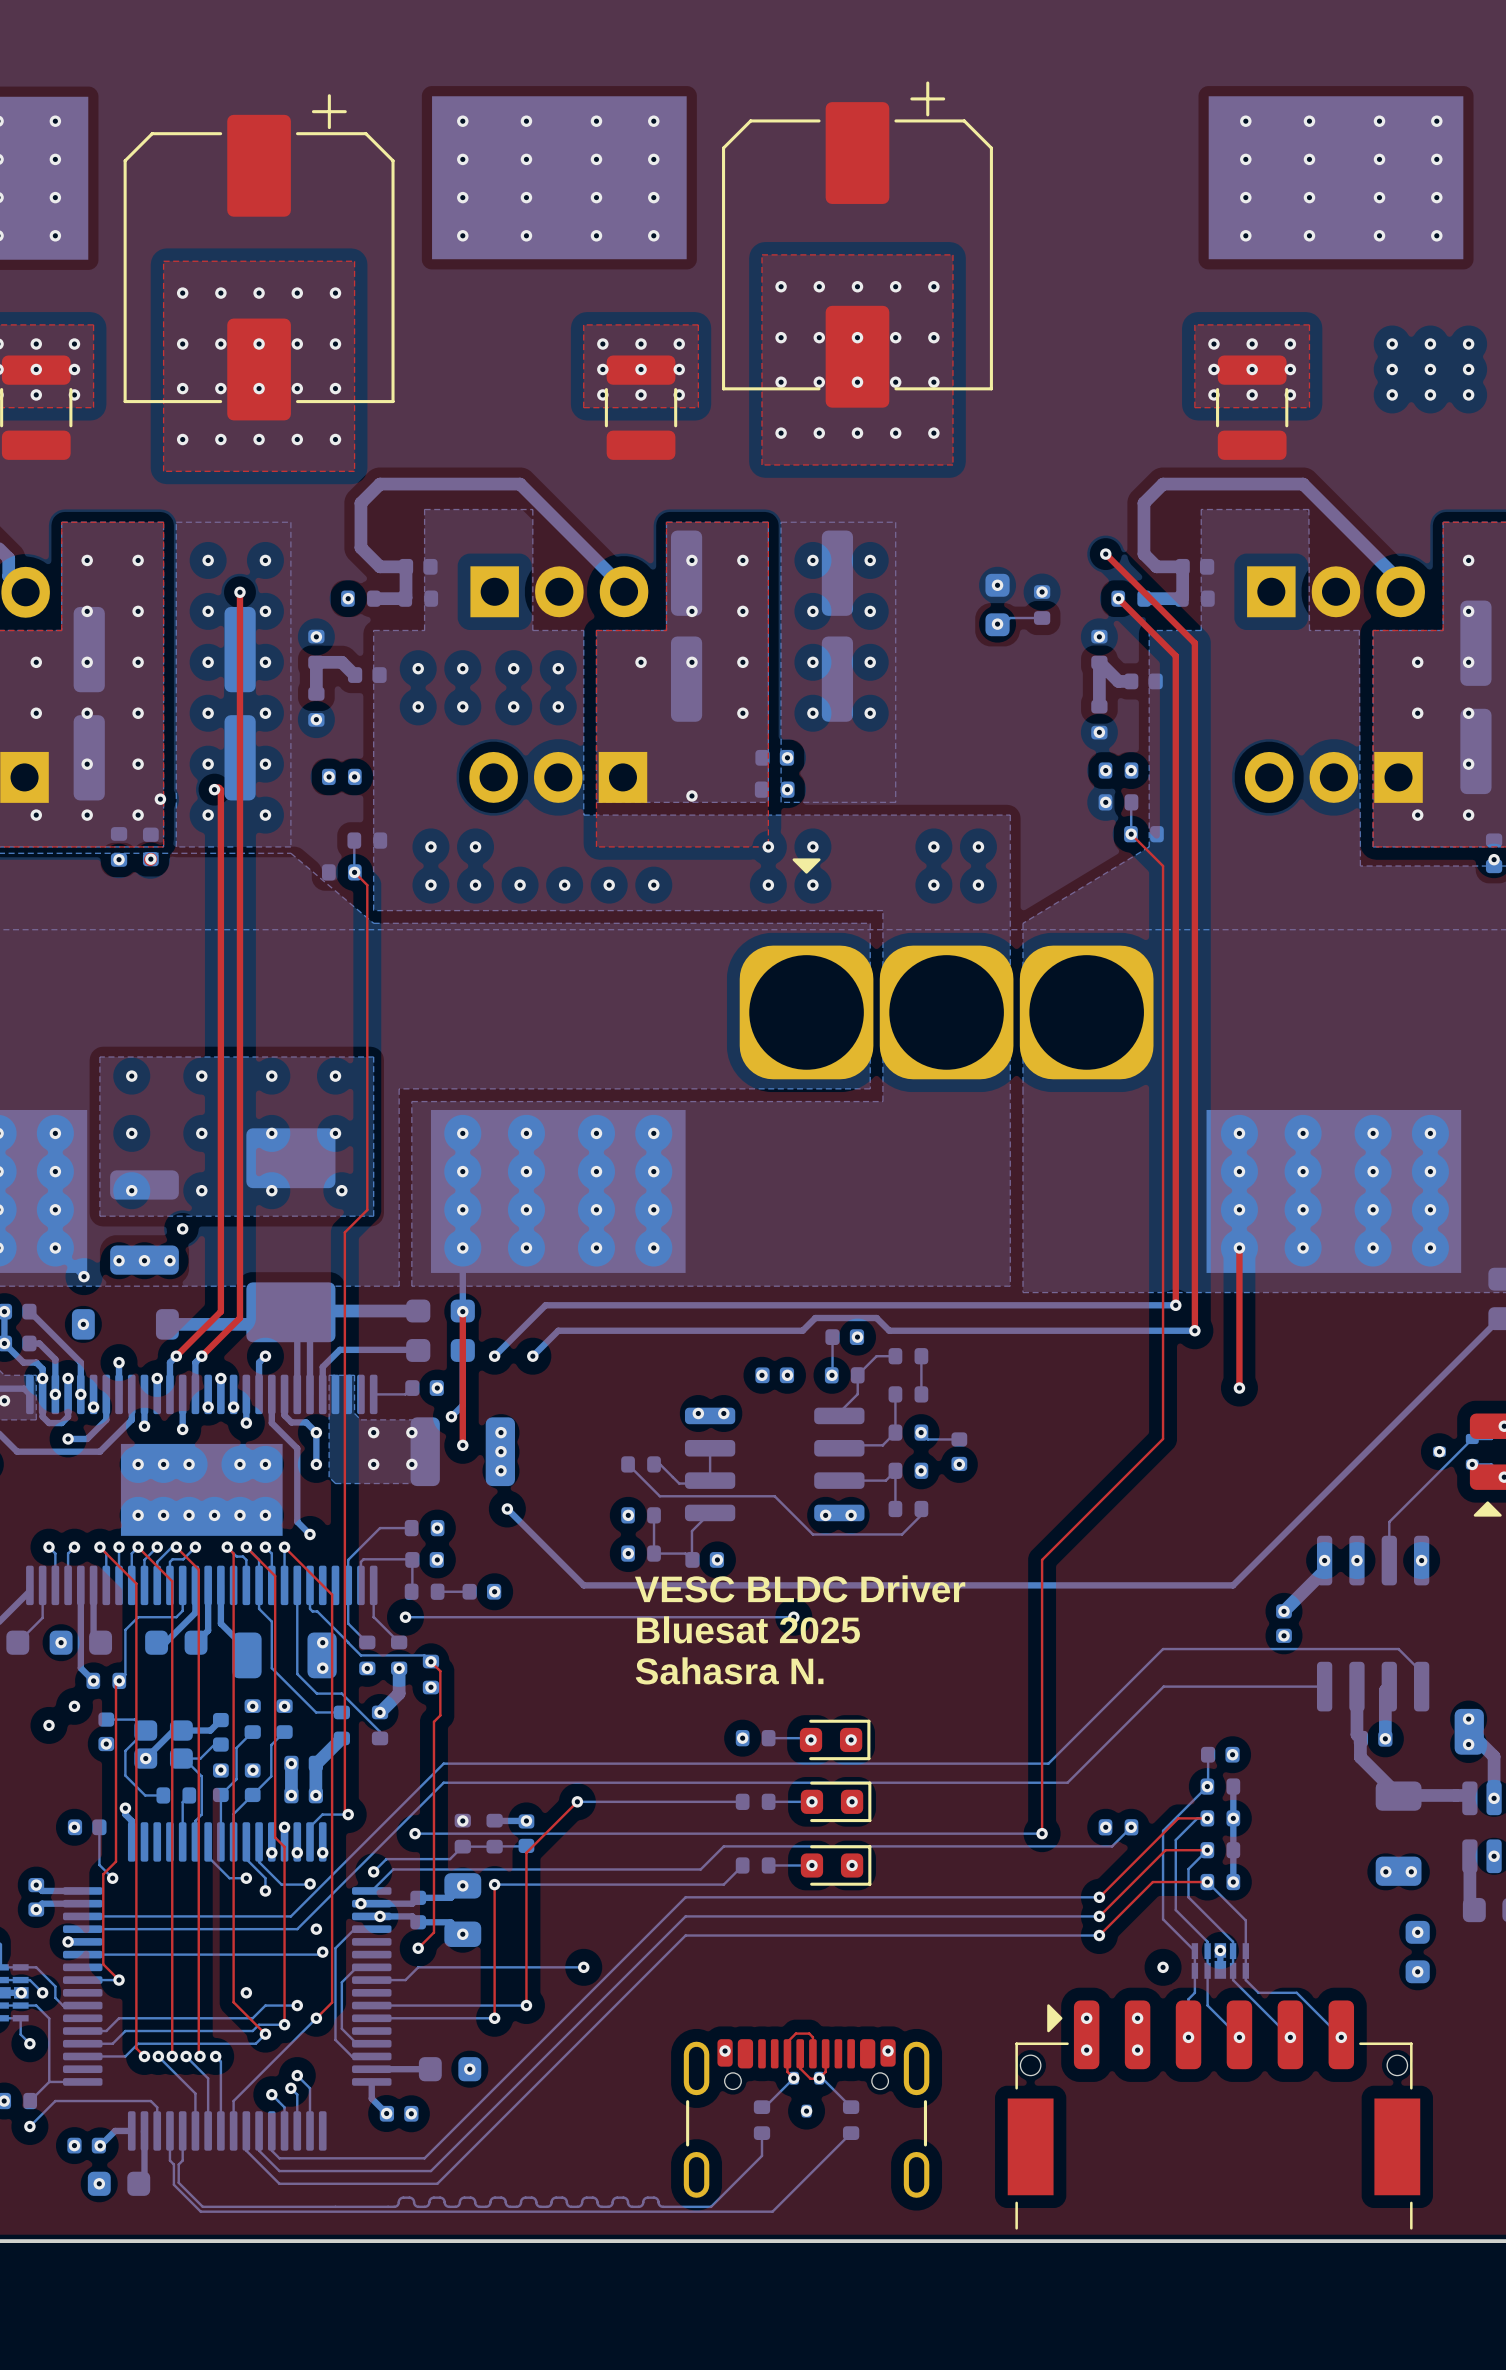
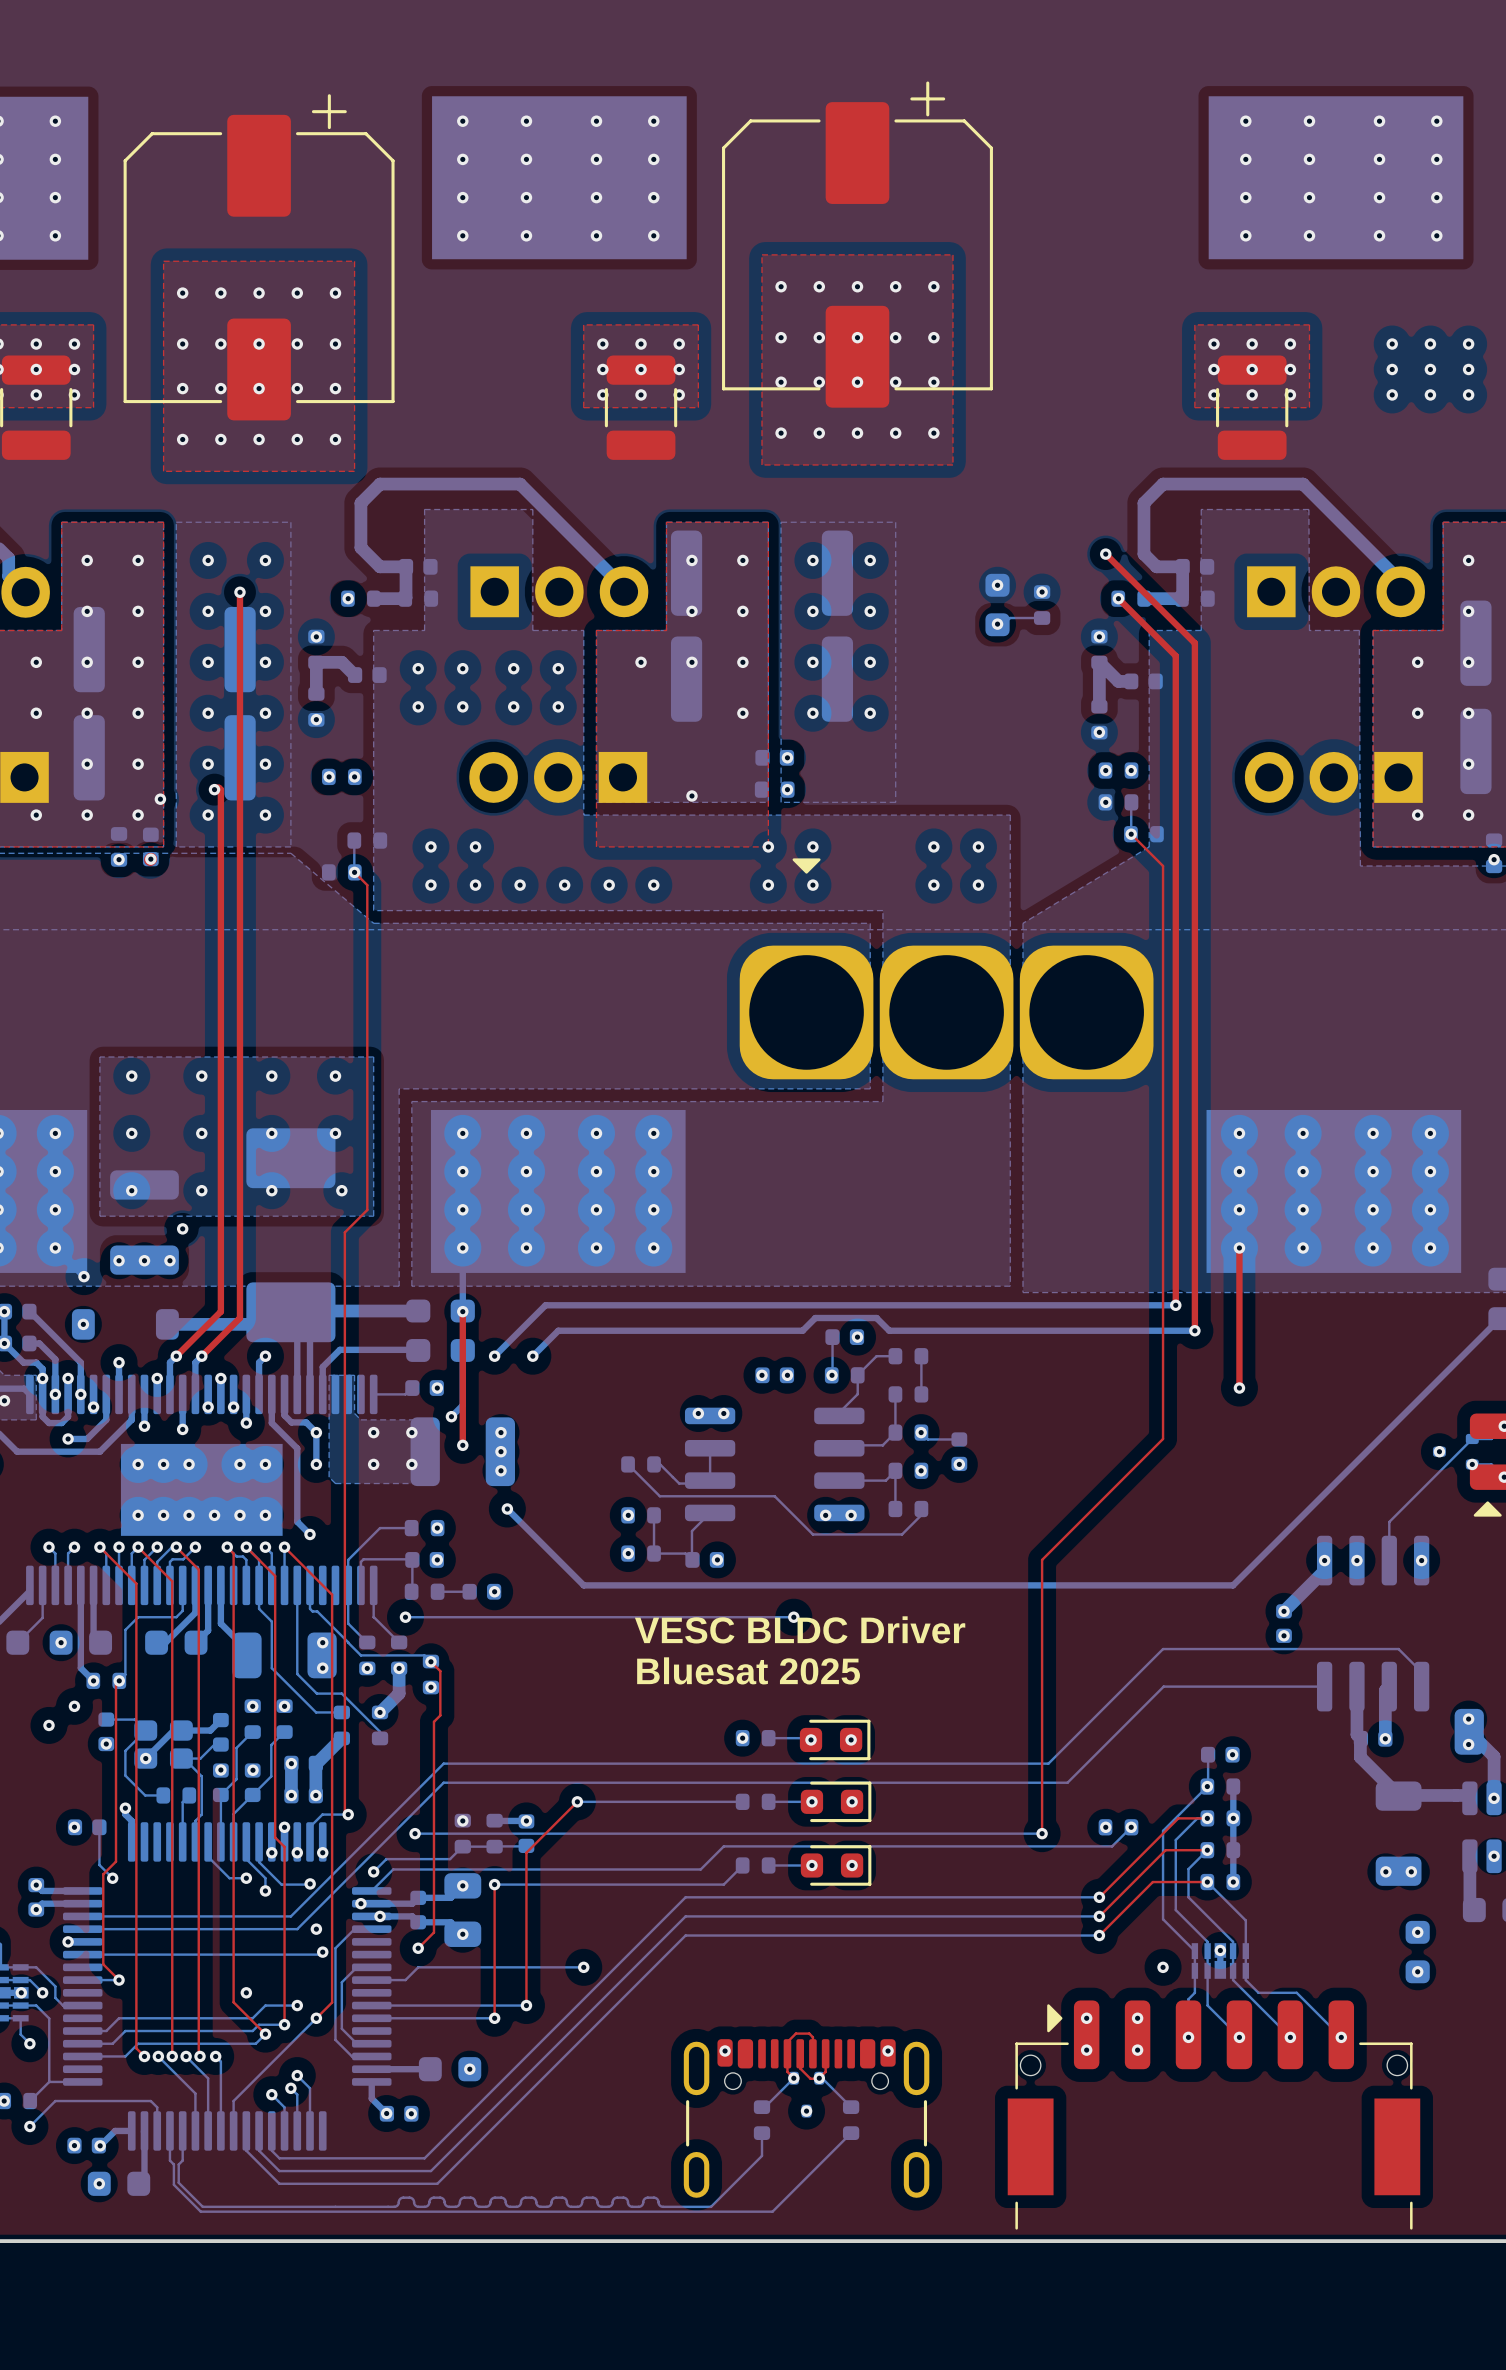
text: VESC BLDC Driver (800, 1588) -> none
text: Bluesat 2025 (748, 1629) -> VESC BLDC Driver (800, 1629)
text: Sahasra N. (729, 1670) -> Bluesat 2025 (748, 1670)

